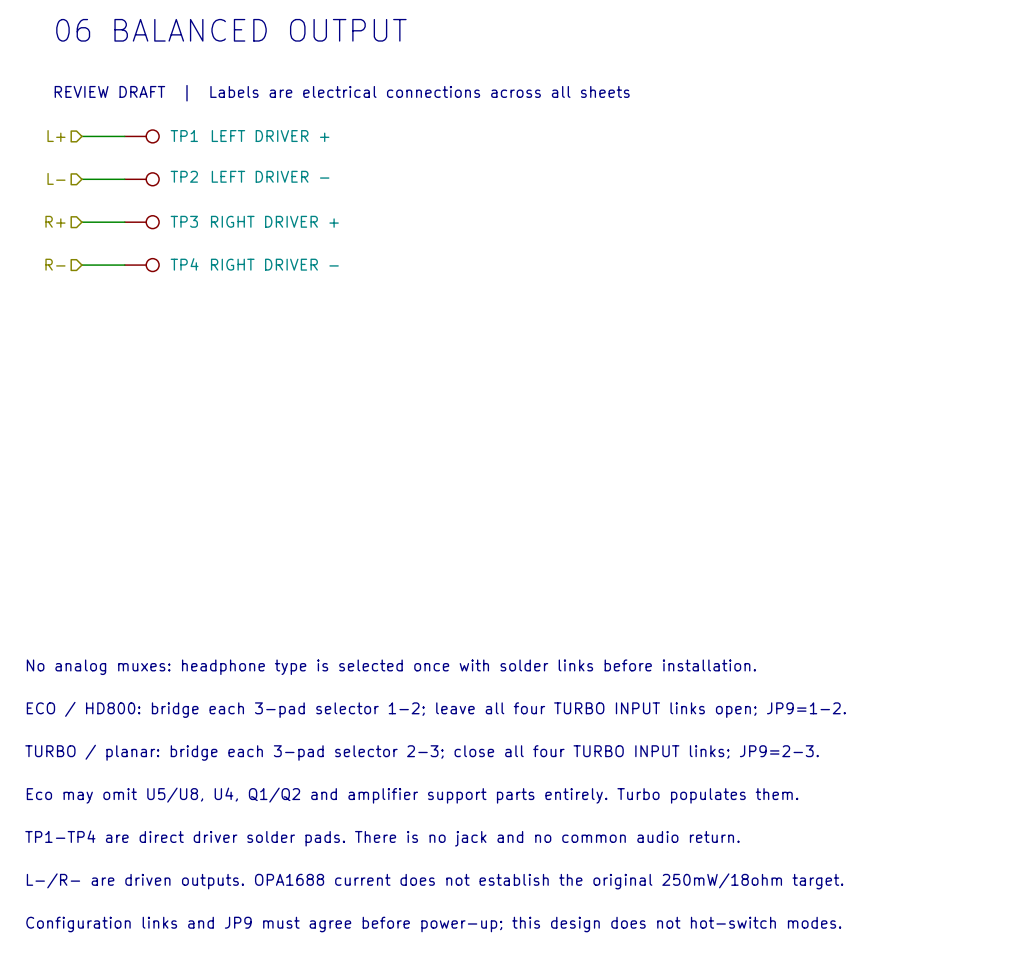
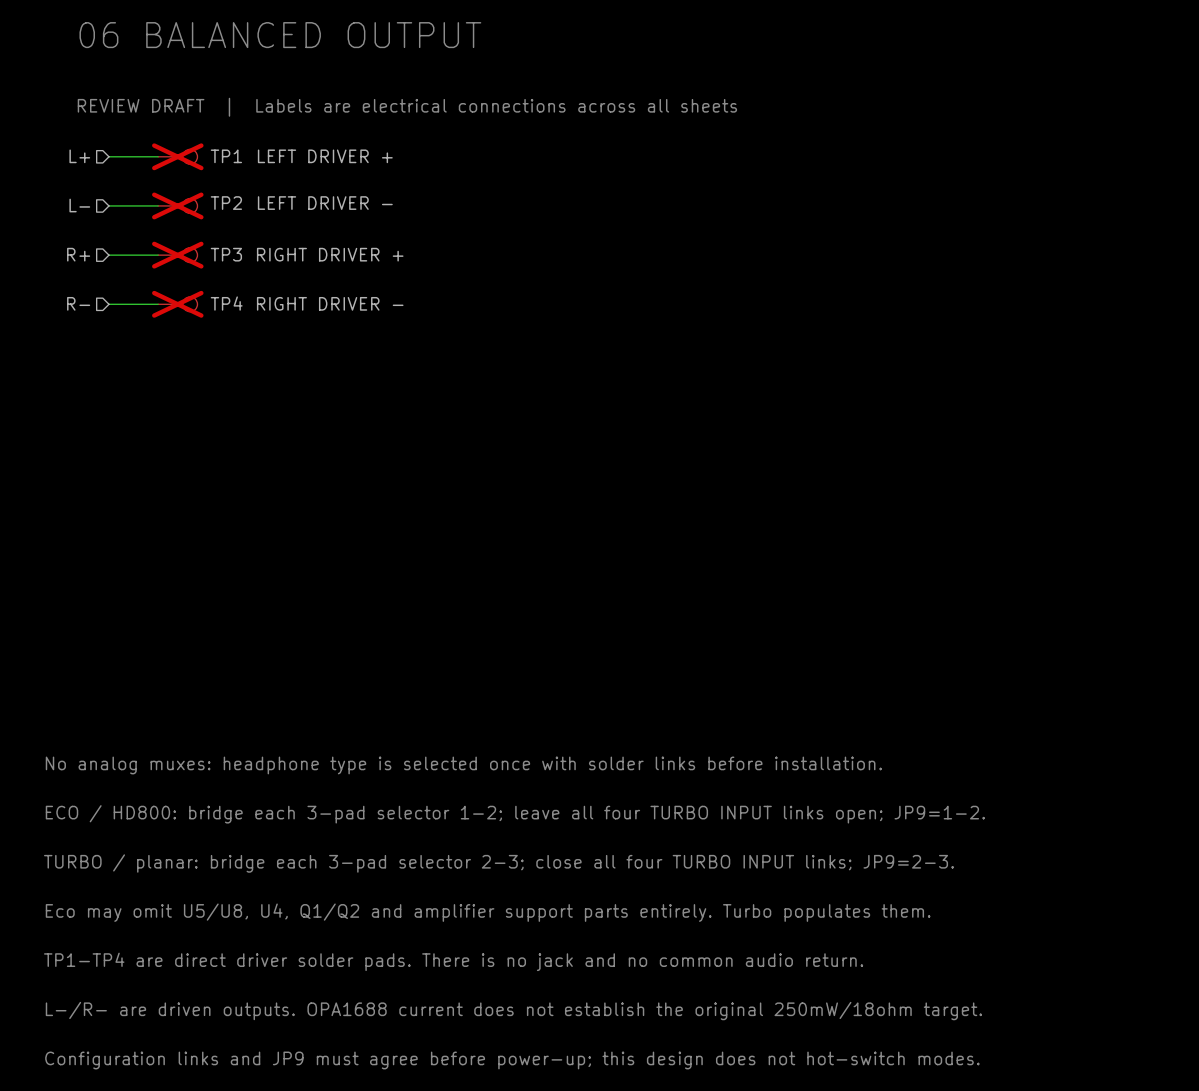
TP1 do-not-place cross: none -> (177, 156)
TP2 do-not-place cross: none -> (177, 205)
TP3 do-not-place cross: none -> (177, 255)
TP4 do-not-place cross: none -> (177, 304)

